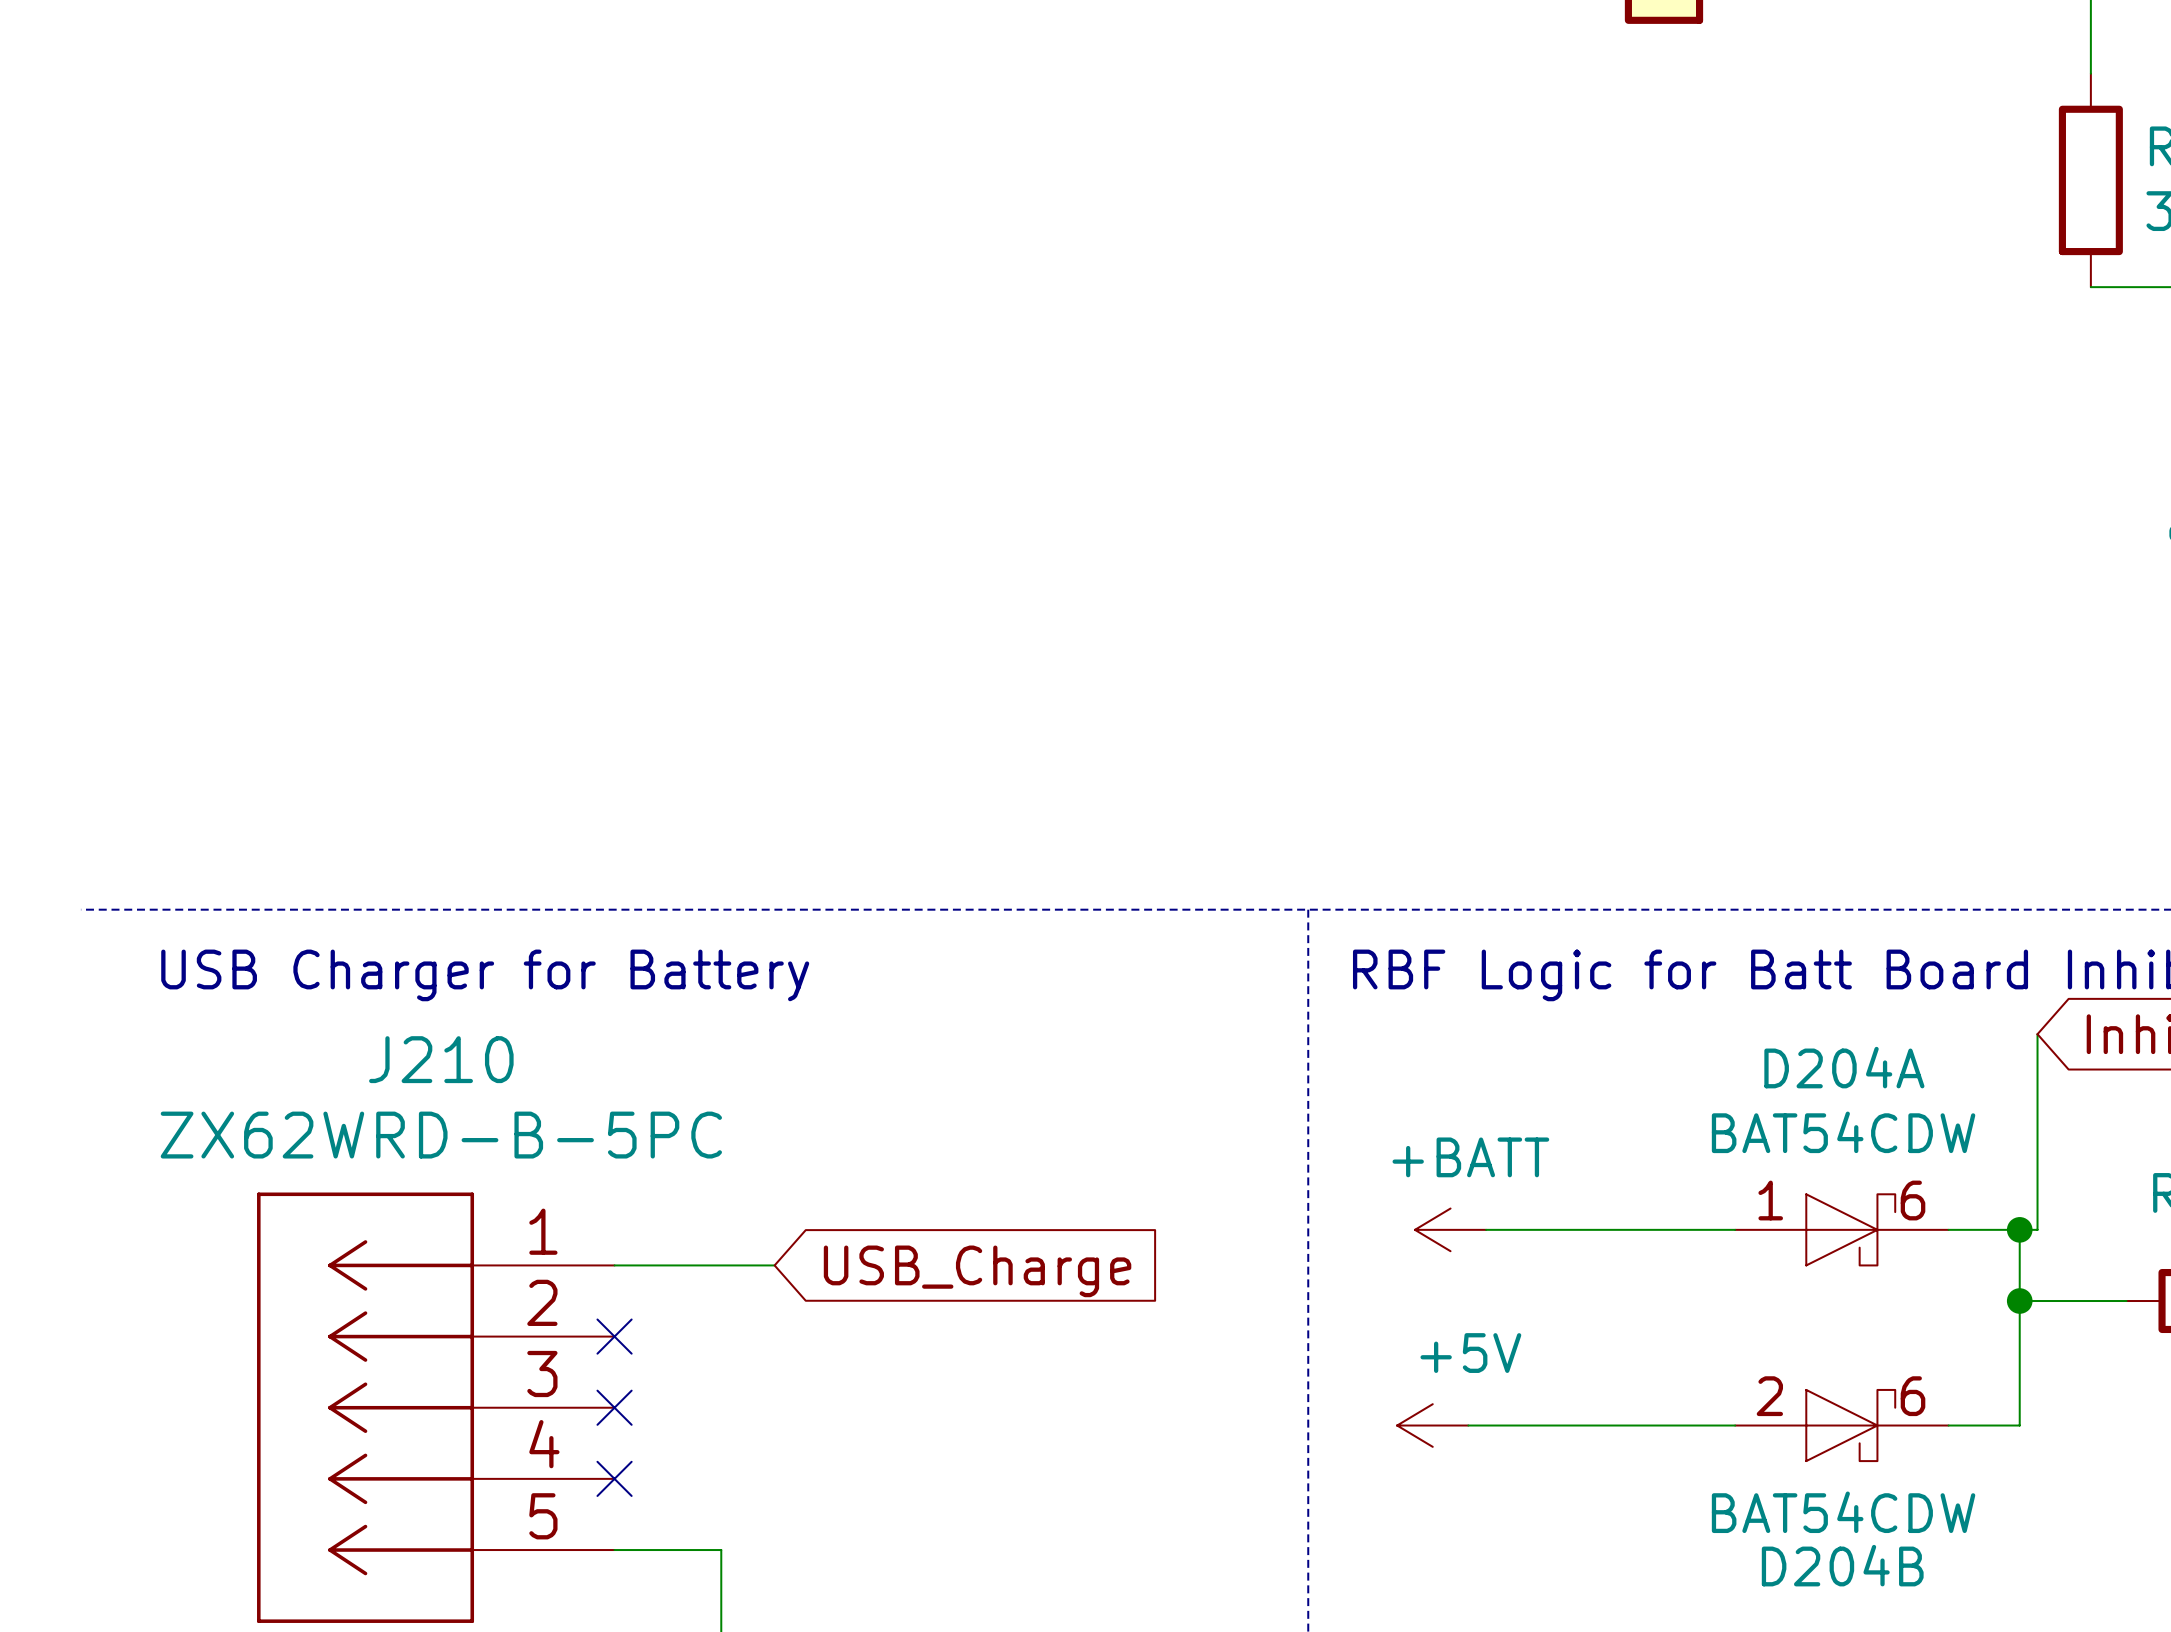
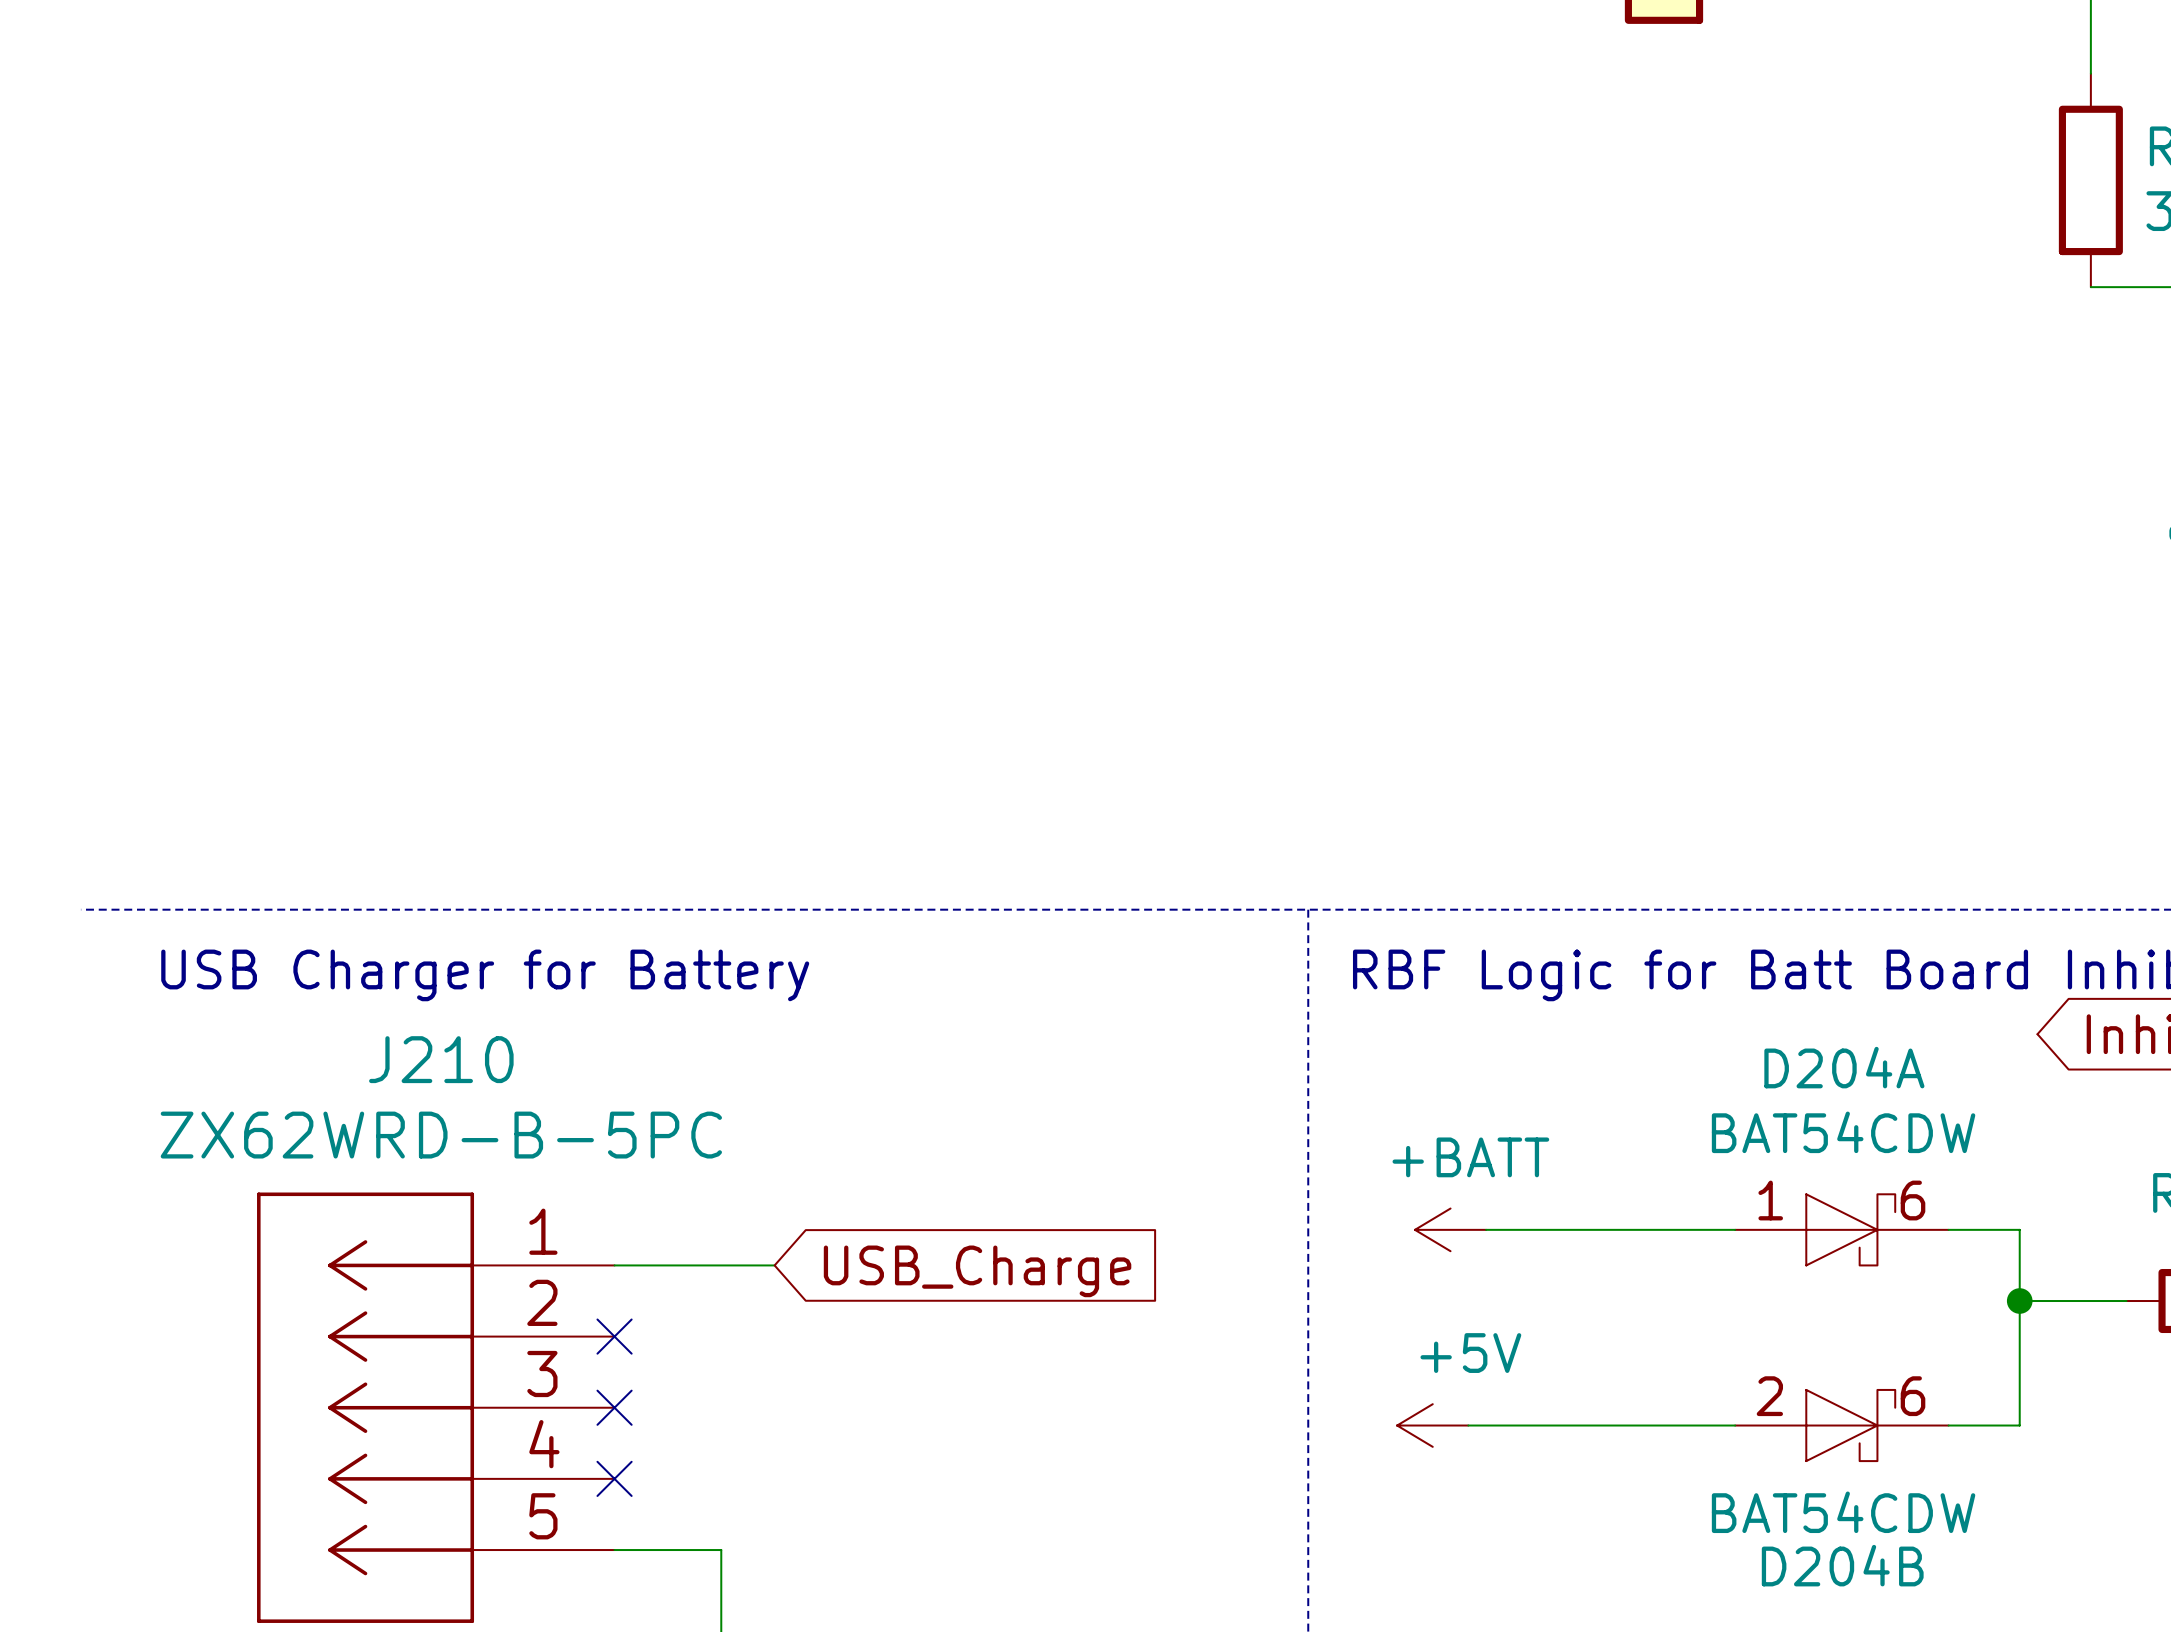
wire: (2037, 1034) (2037, 1229) (2019, 1229) -> none
junction: (2019, 1229) -> none

